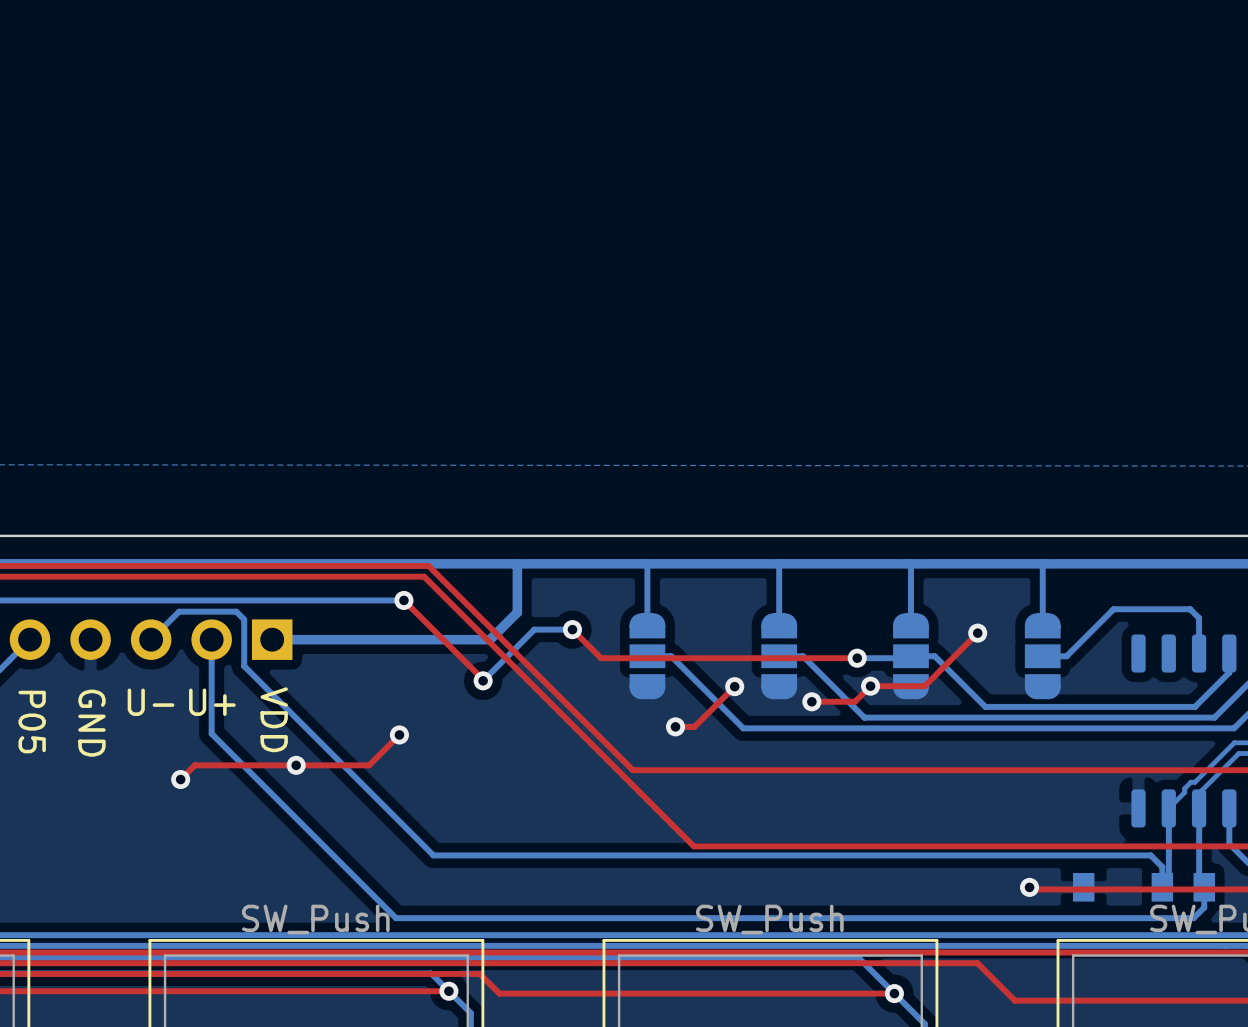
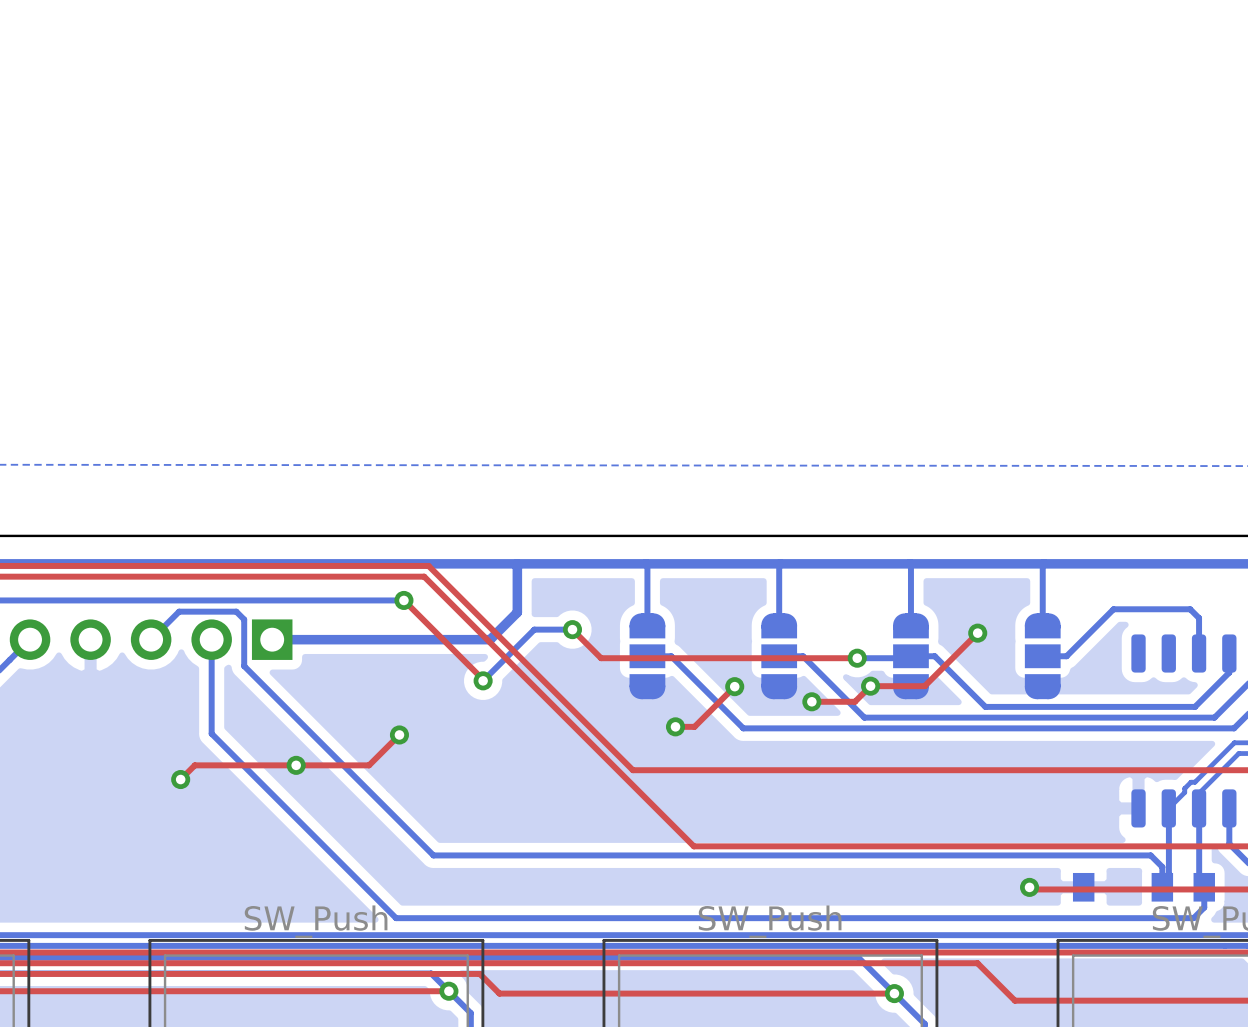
text: U- (151, 702) -> none
text: U+ (212, 702) -> none
text: VDD (274, 719) -> none
text: P05 (32, 722) -> none
text: GND (91, 723) -> none

